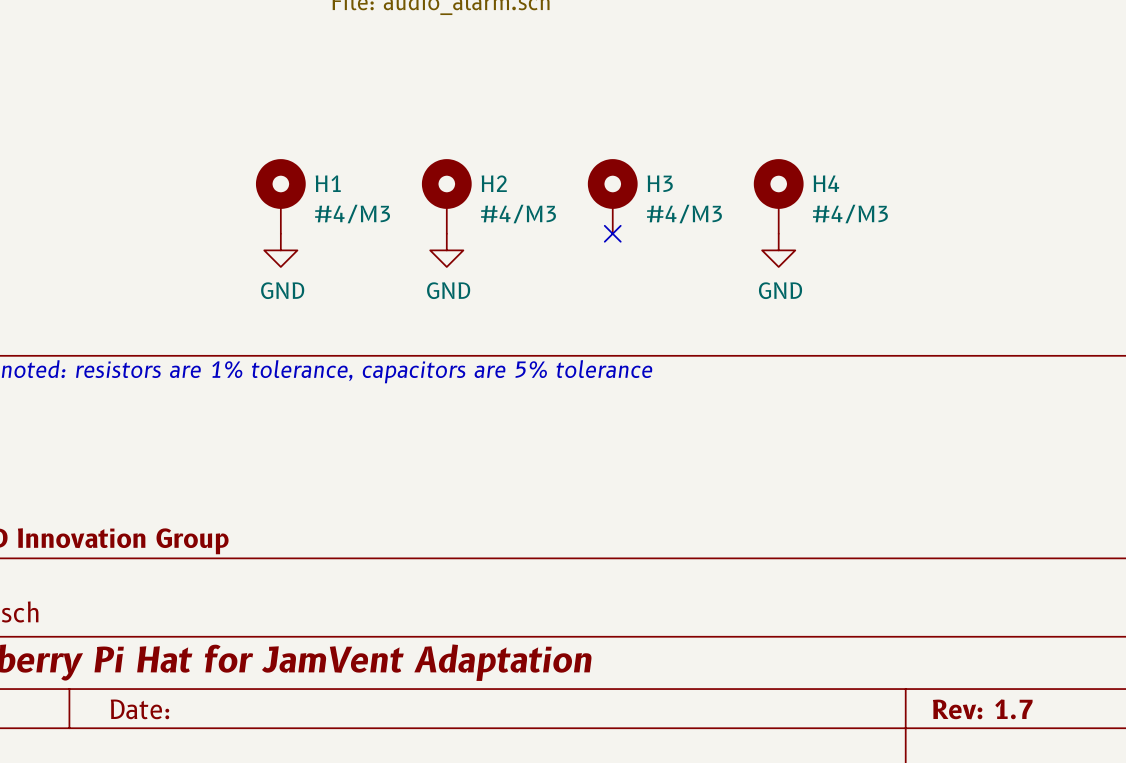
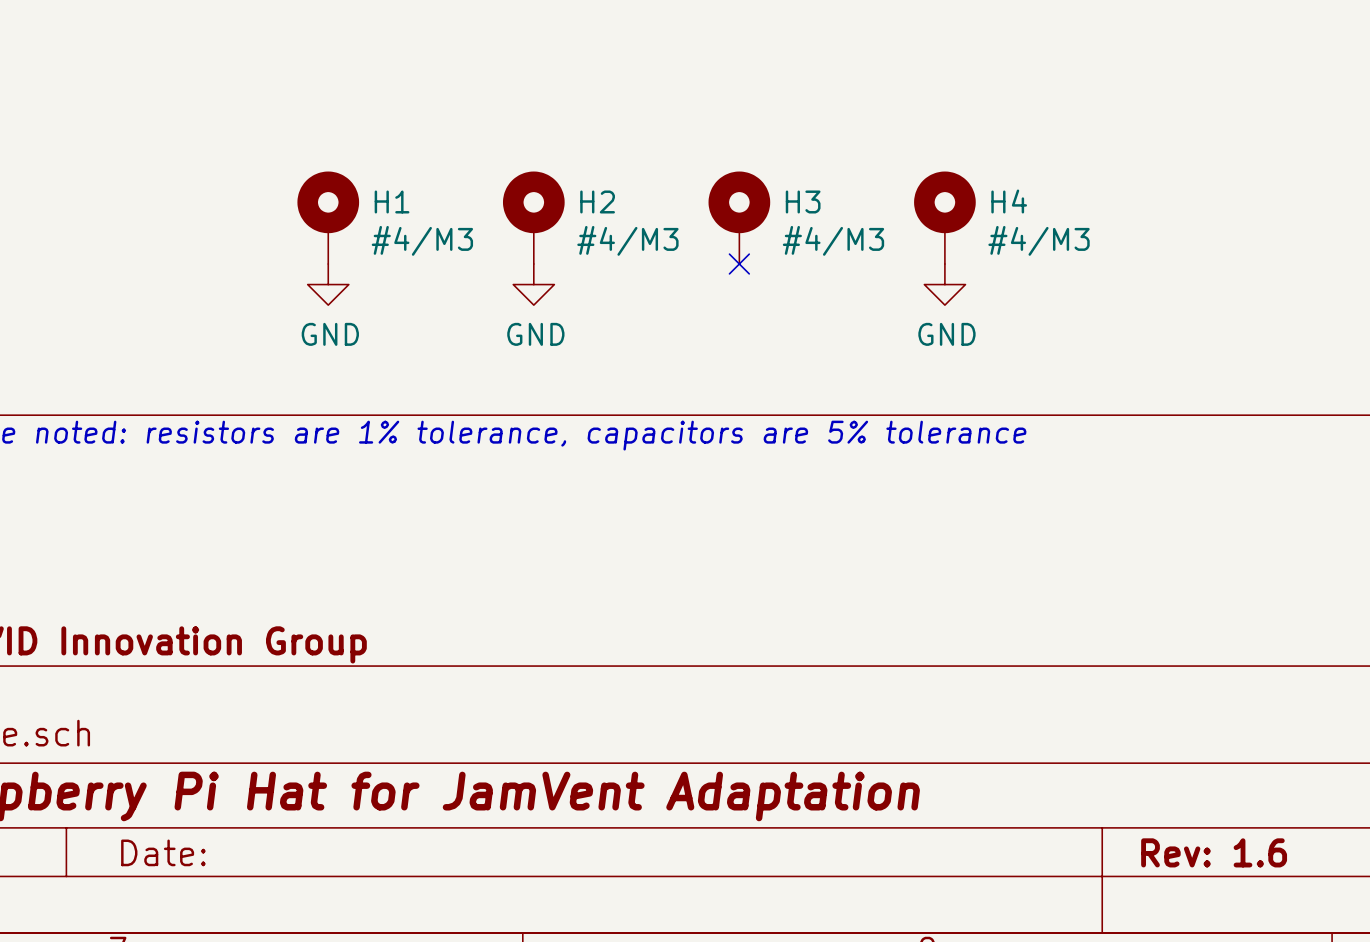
title block: Rev: 1.7 (982, 709) -> Rev: 1.6 (1214, 852)

